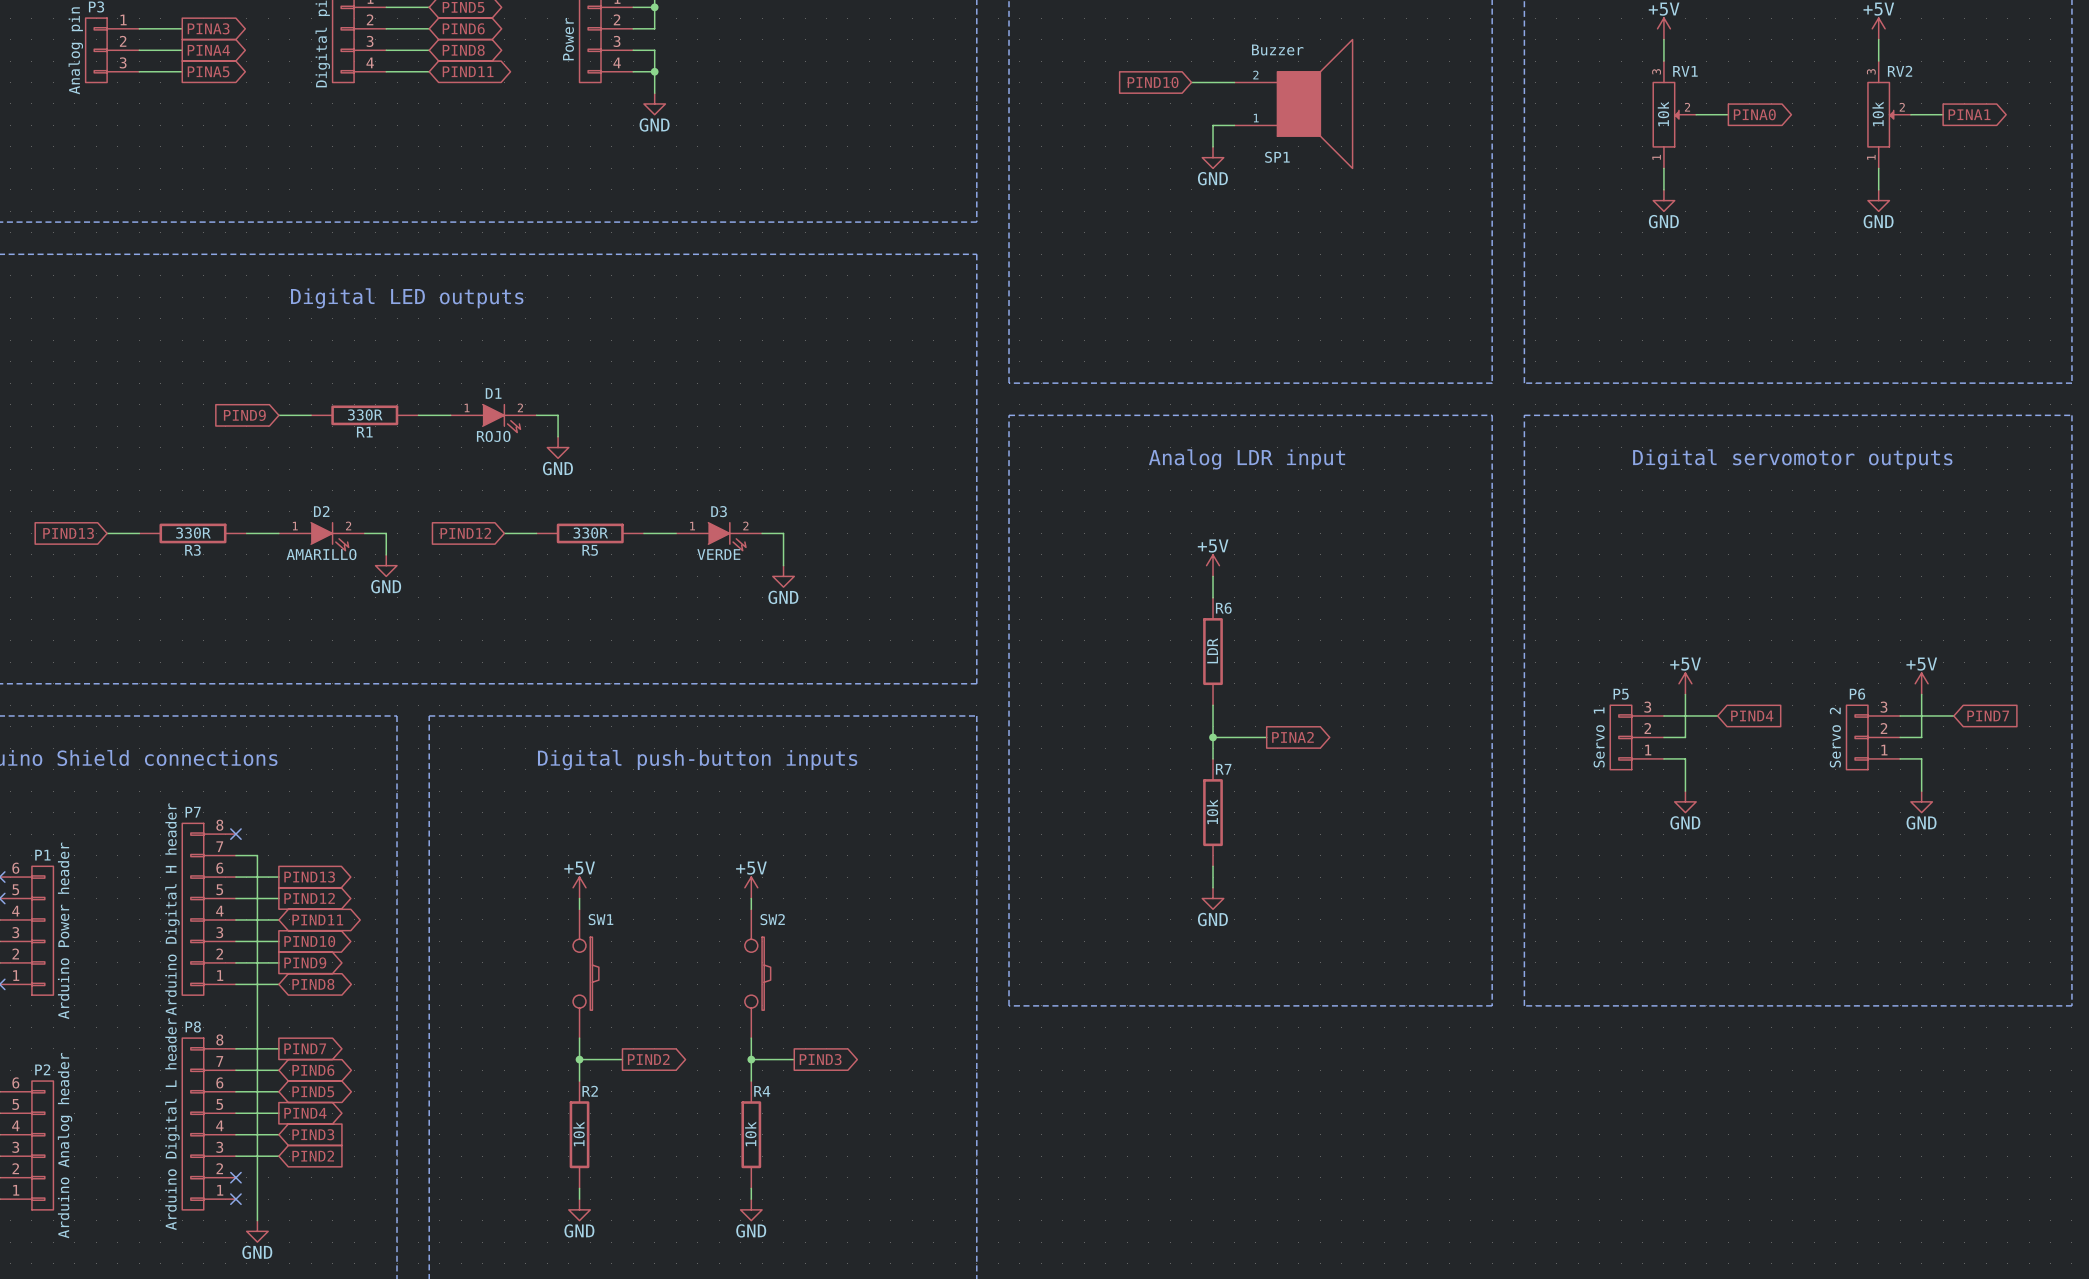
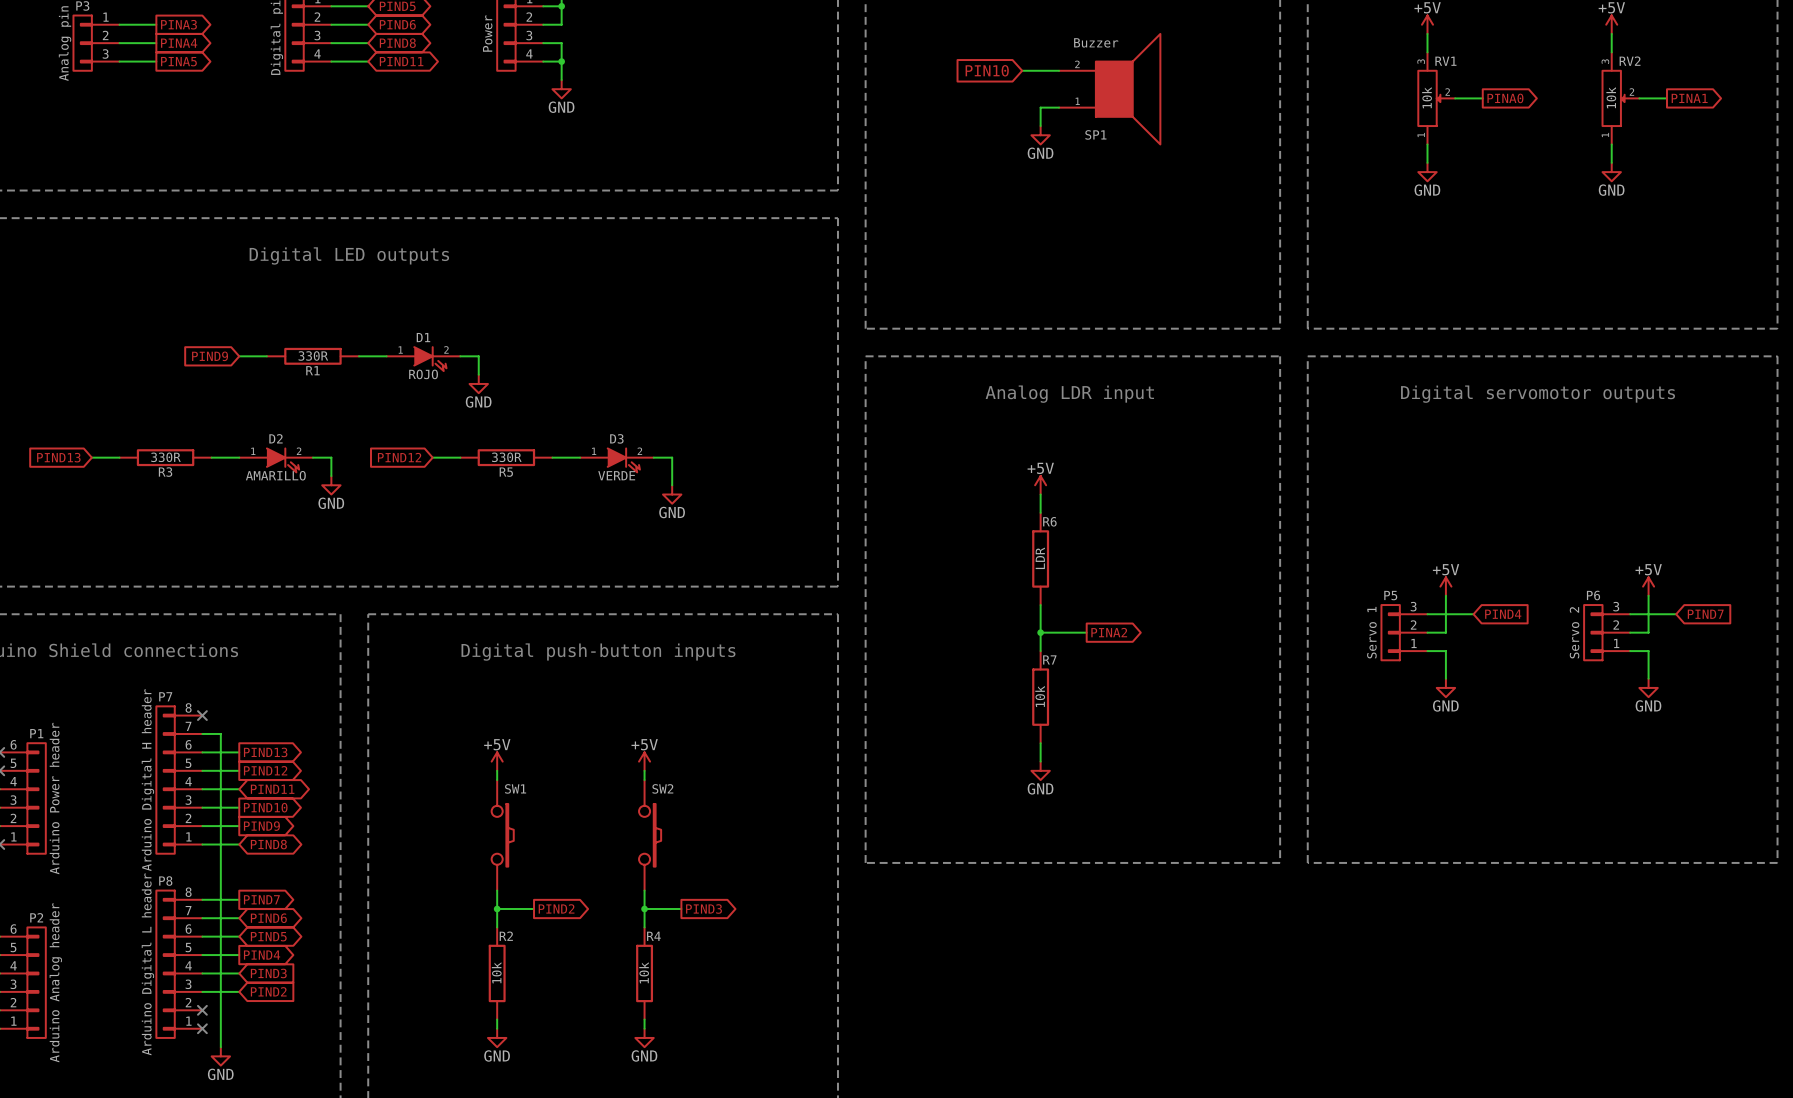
global label: PIND10 (1153, 82) -> PIN10 (987, 70)

